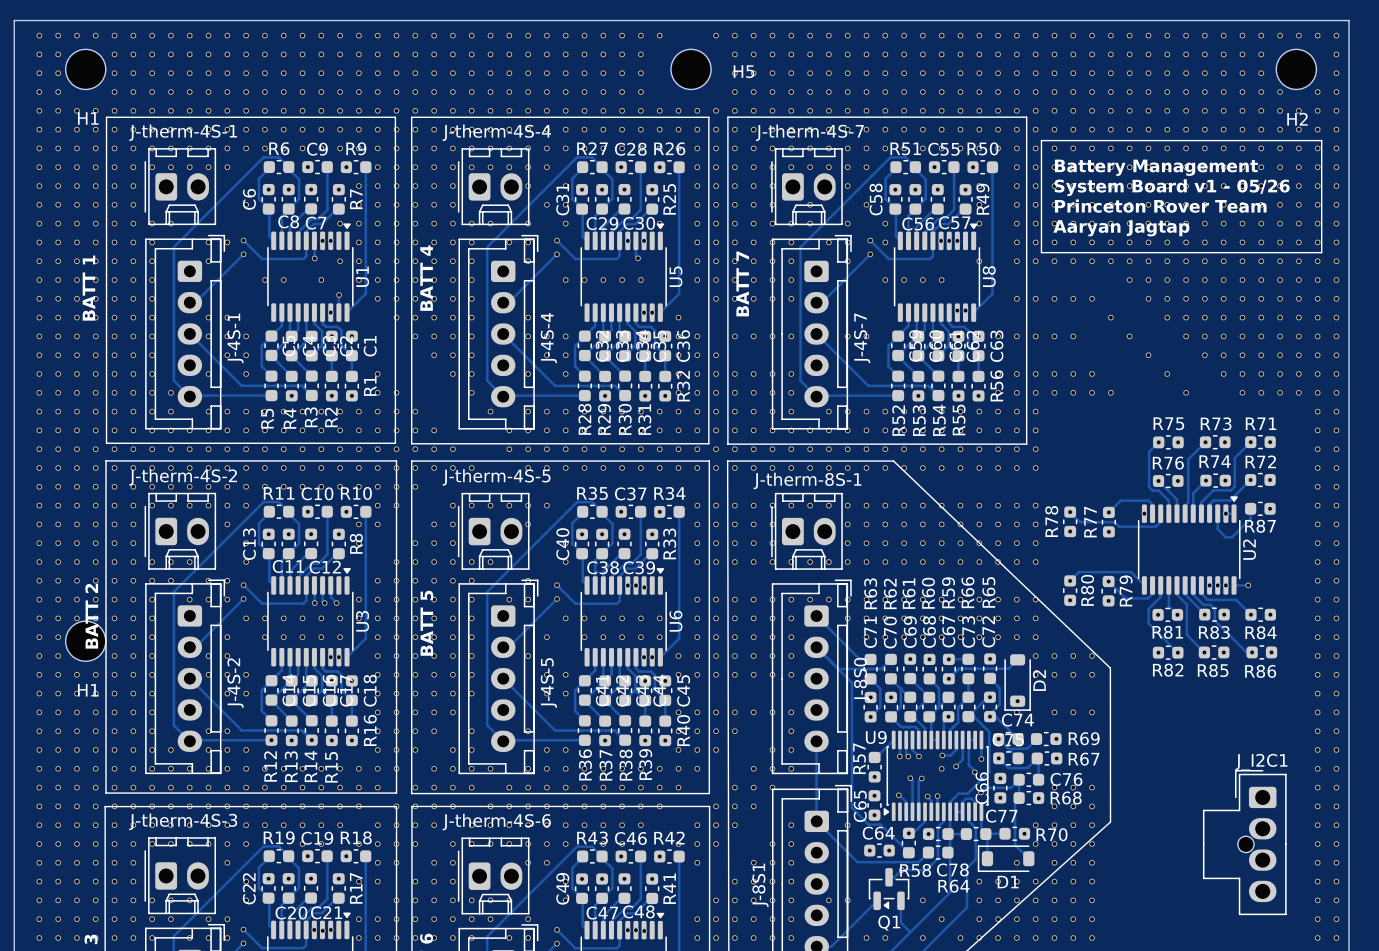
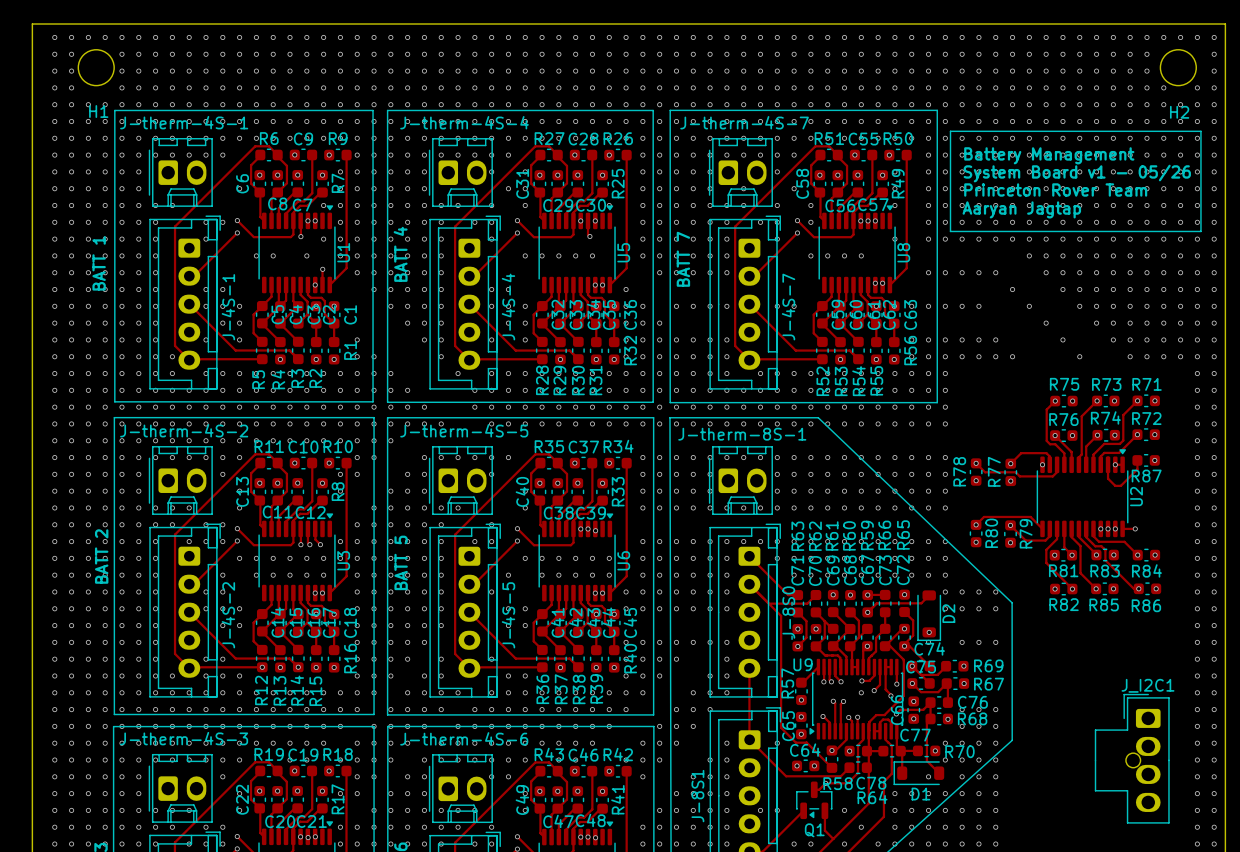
via: none -> (626, 37)
via: none -> (642, 37)
via: none -> (609, 54)
via: none -> (626, 54)
via: none -> (642, 54)
via: none -> (659, 54)
H5: (691, 69) -> none
via: none -> (609, 71)
via: none -> (626, 71)
via: none -> (642, 71)
via: none -> (659, 71)
via: none -> (609, 87)
via: none -> (626, 87)
via: none -> (642, 87)
via: none -> (659, 87)
H1: (85, 641) -> none

